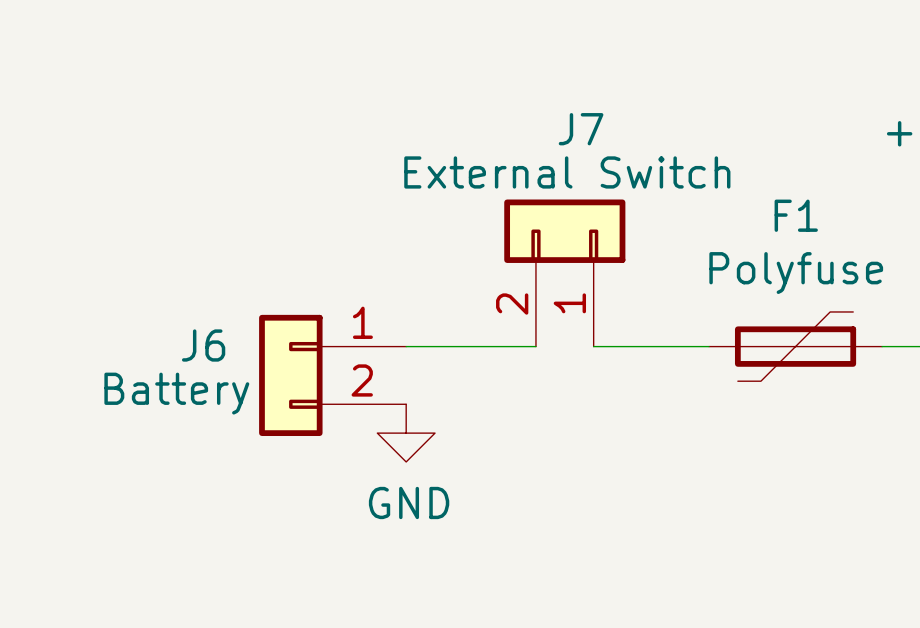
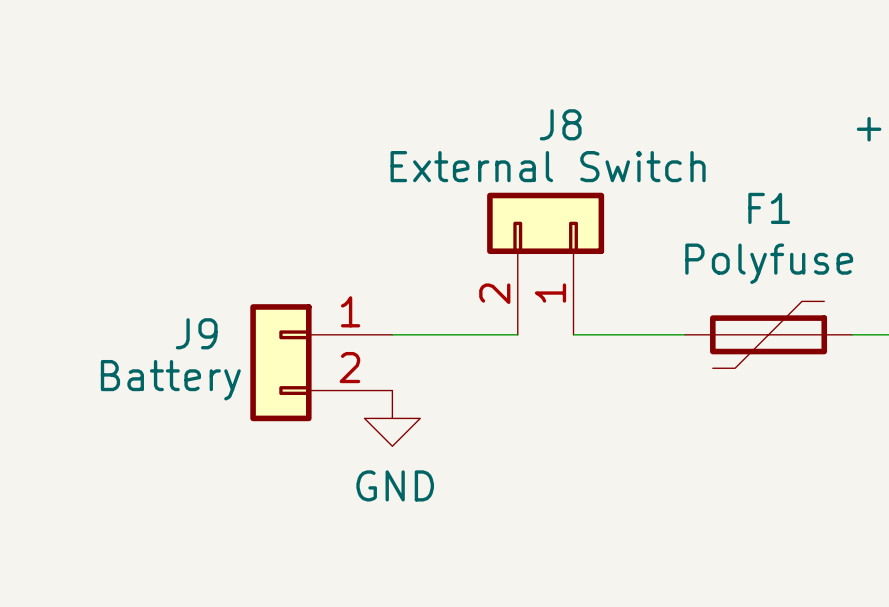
J7 name: J7 (581, 129) -> J8 (560, 124)
J6 name: J6 (203, 345) -> J9 (196, 333)

